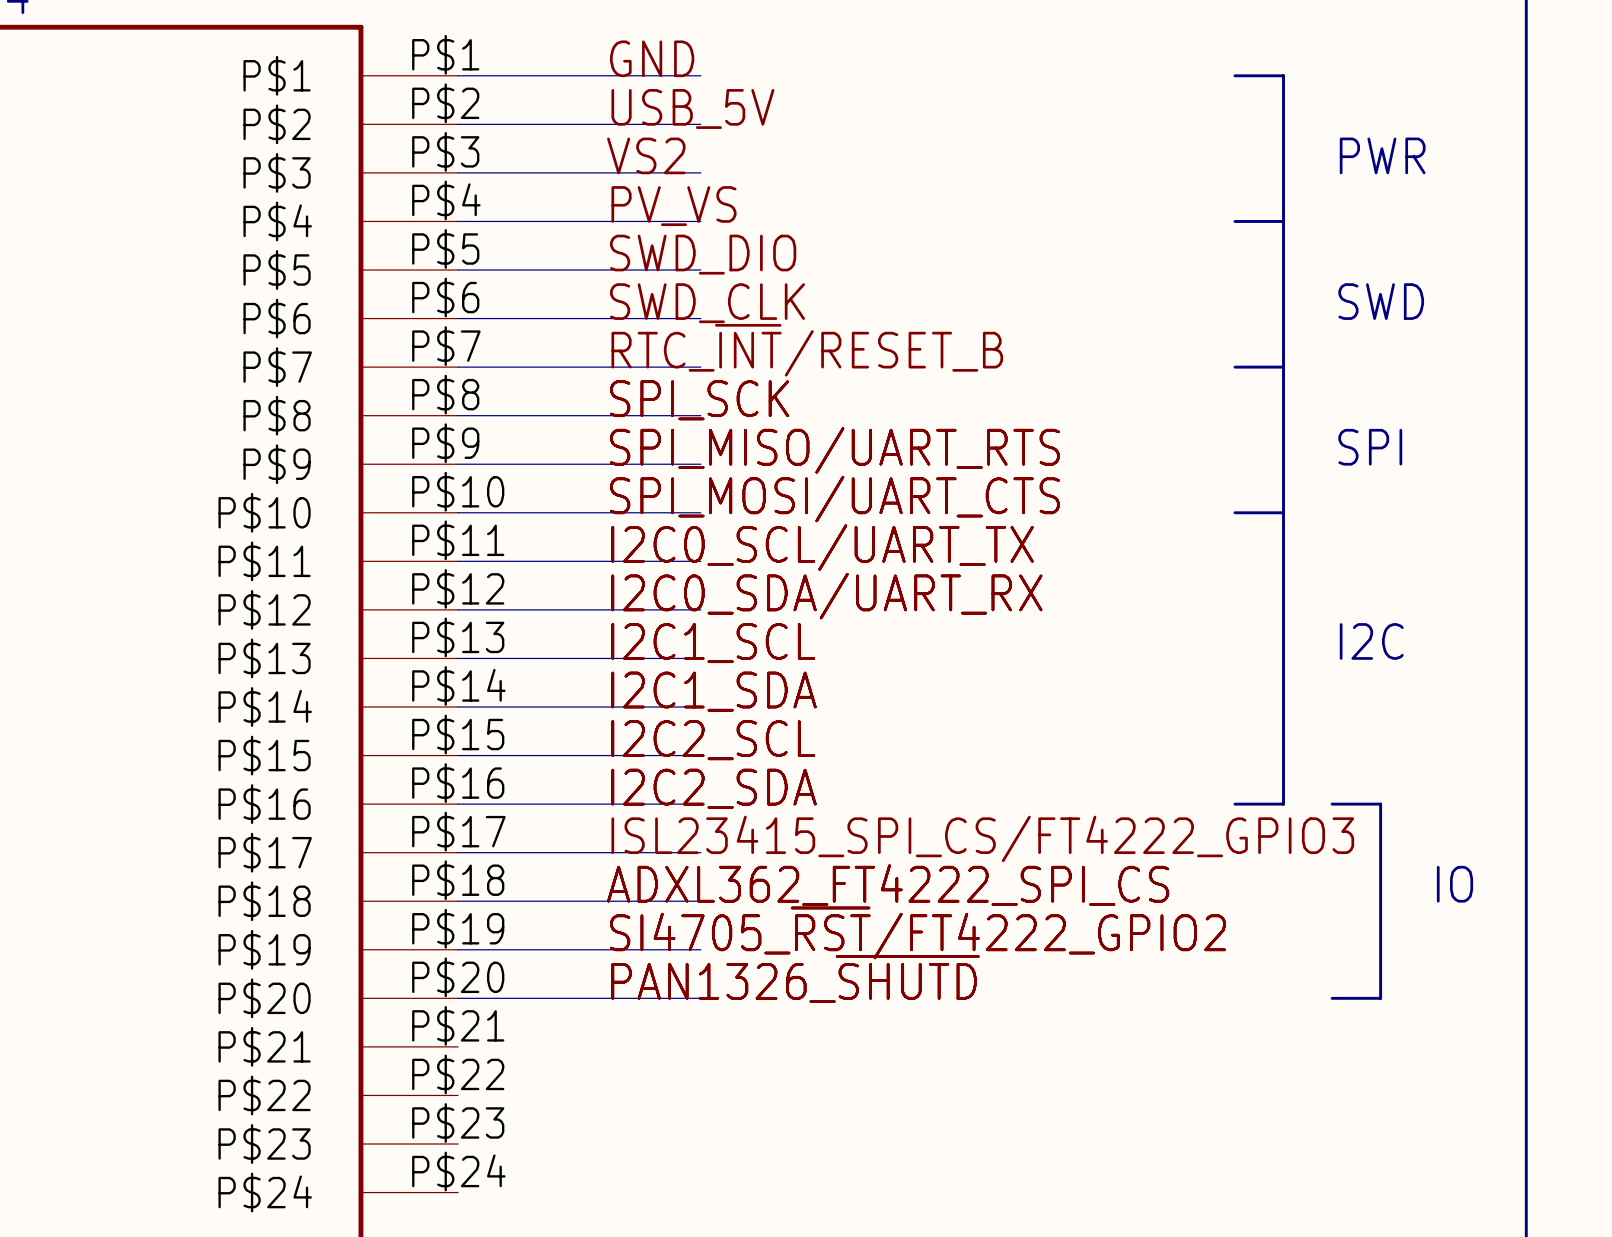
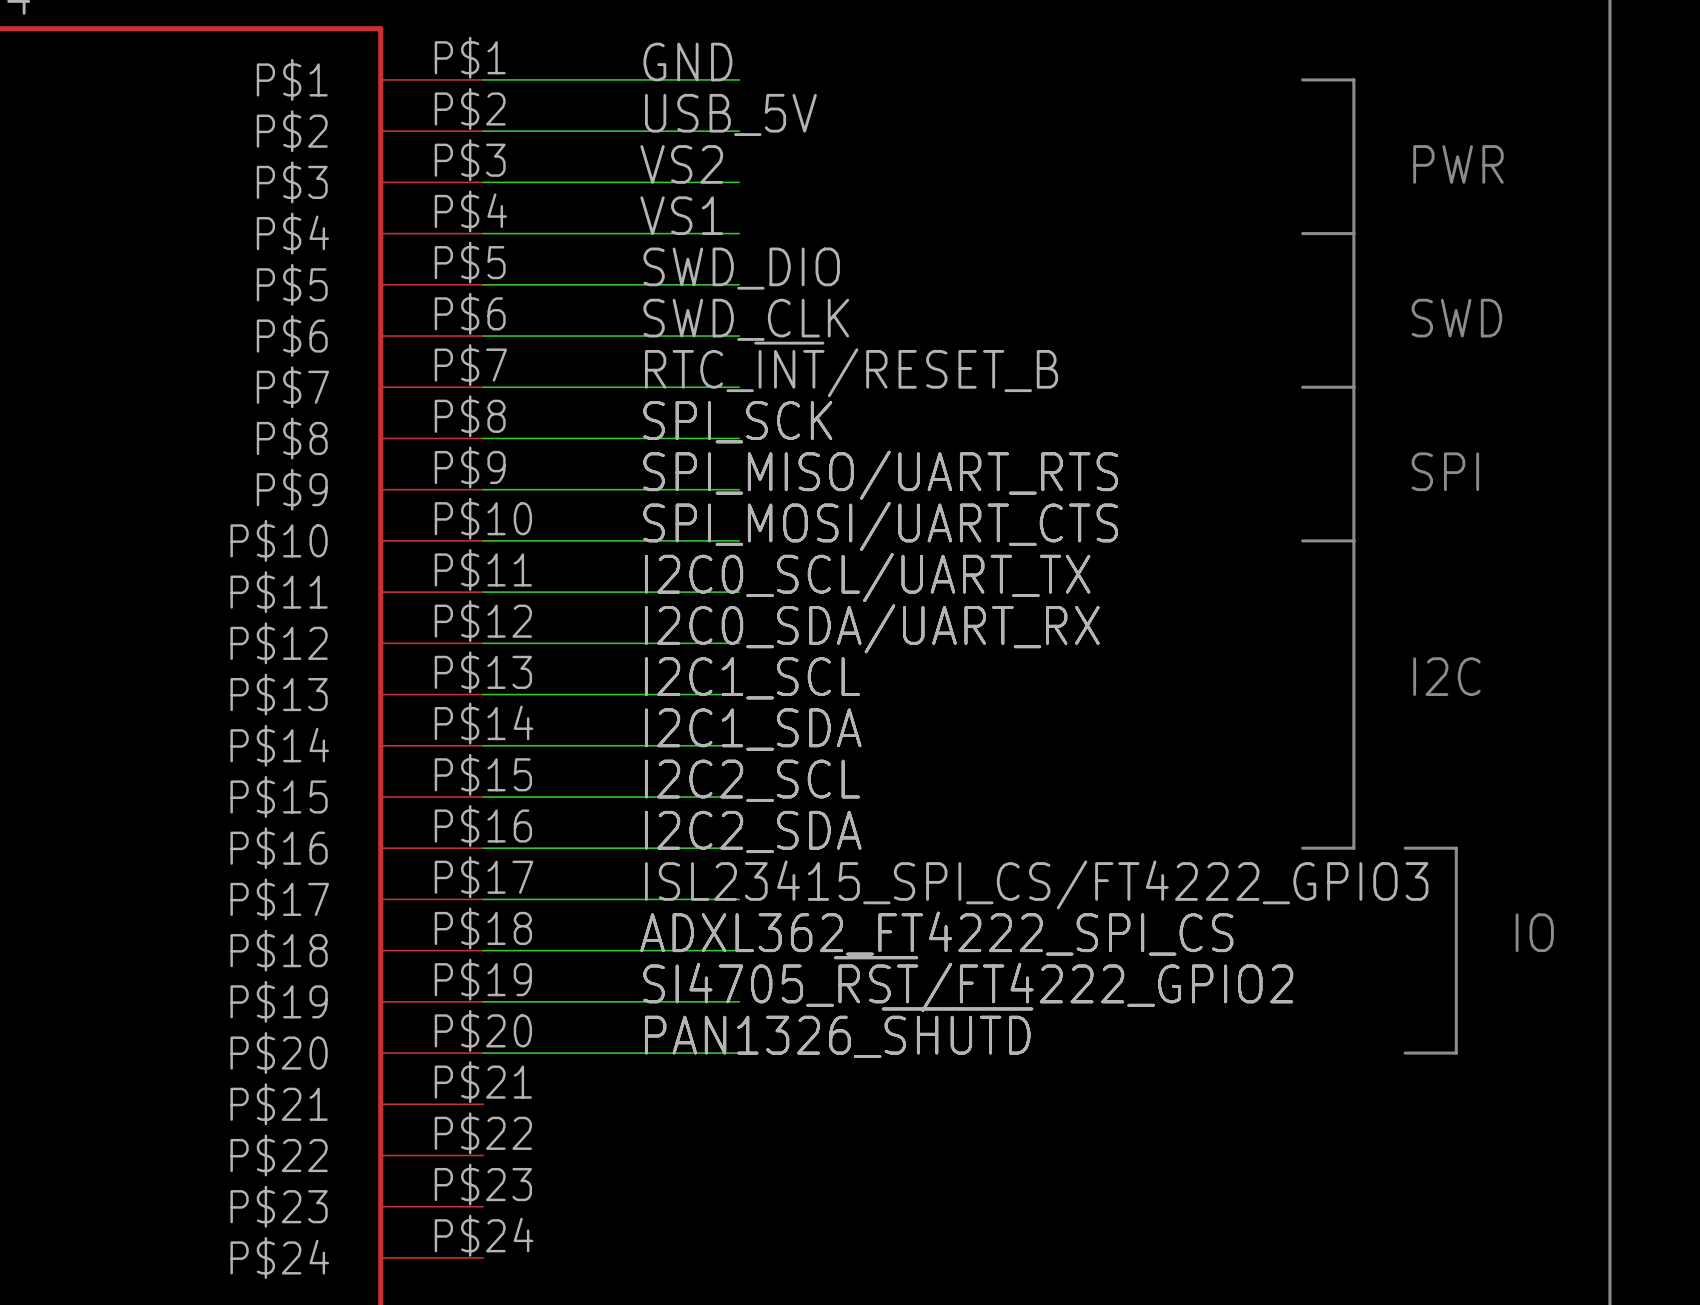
label: PV_VS (673, 206) -> VS1 (681, 215)

